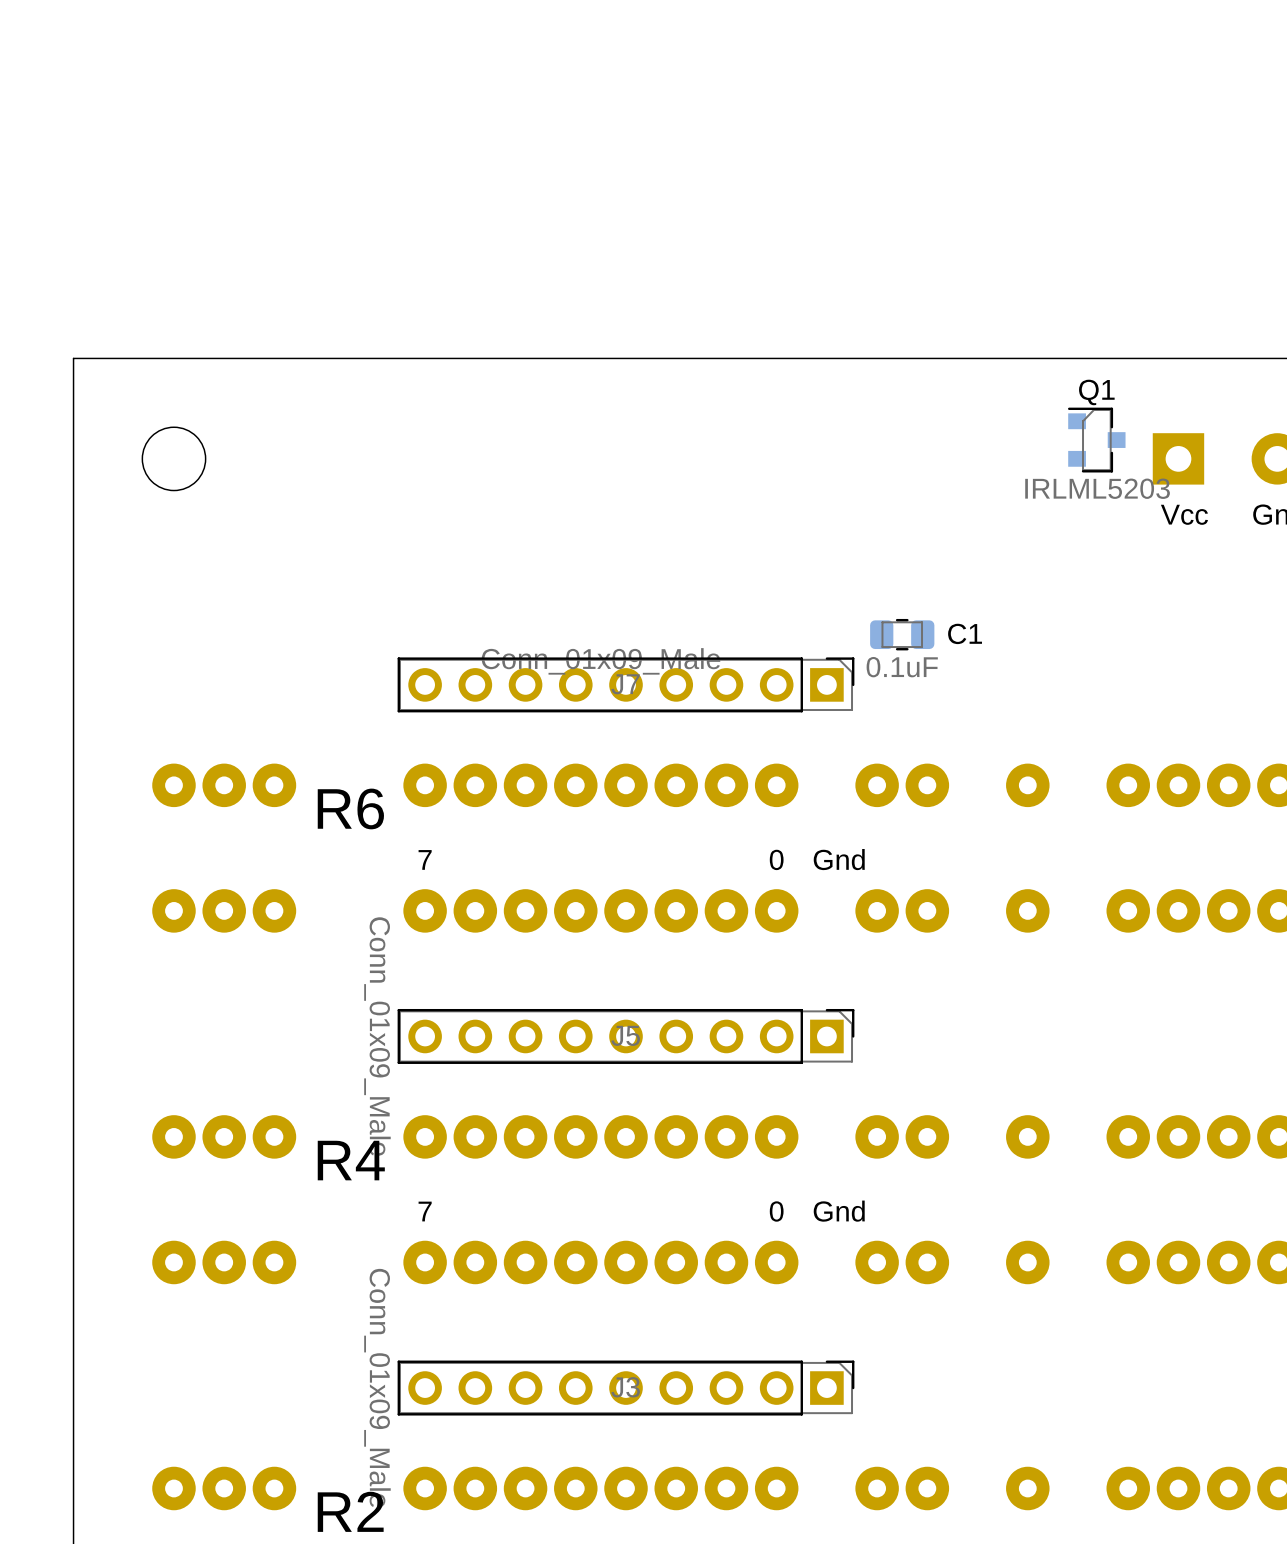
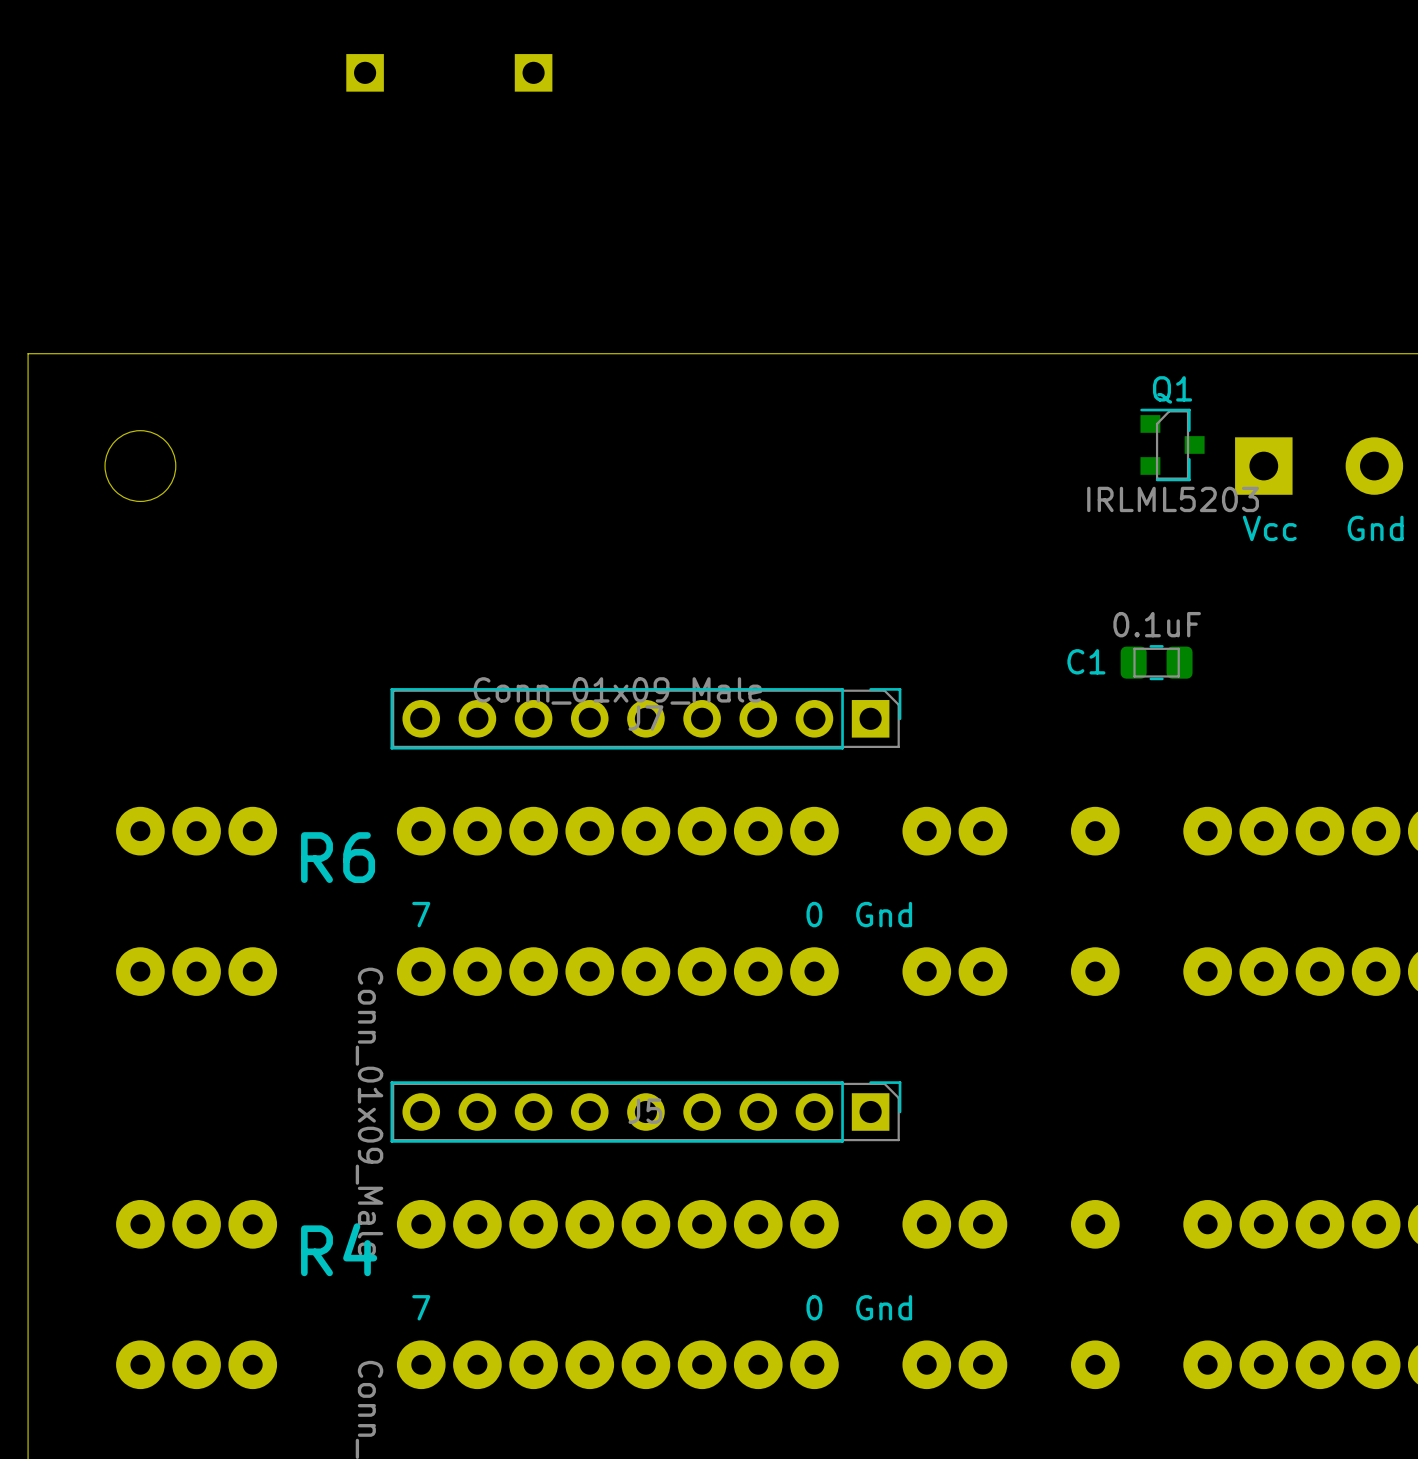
part: none -> (365, 72)
part: none -> (533, 72)
C1 name position: C1 (965, 633) -> C1 (1086, 661)
C1 position: (902, 634) -> (1156, 662)
C1 value position: 0.1uF (902, 667) -> 0.1uF (1157, 624)

